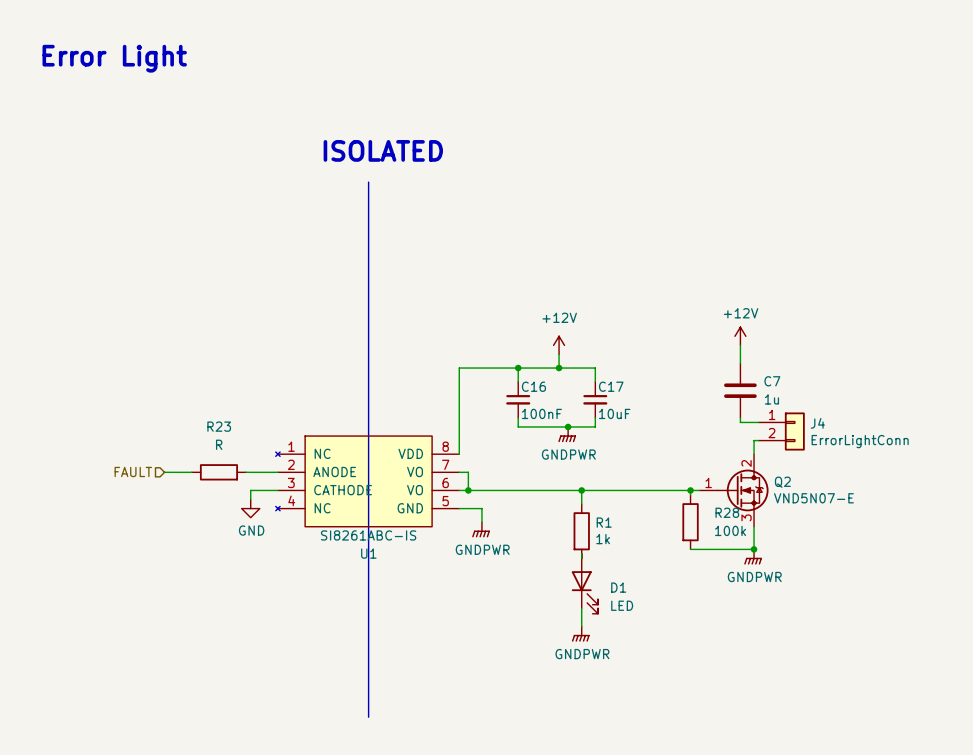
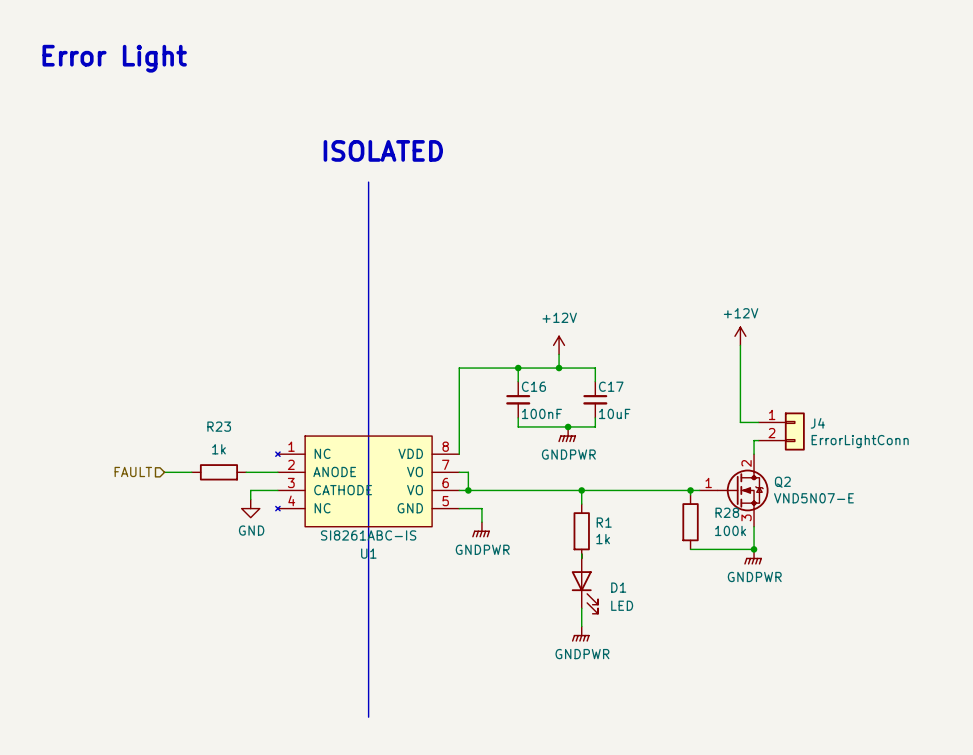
C7: 1u (740, 390) -> none
R23 value: R (219, 444) -> 1k (218, 449)

